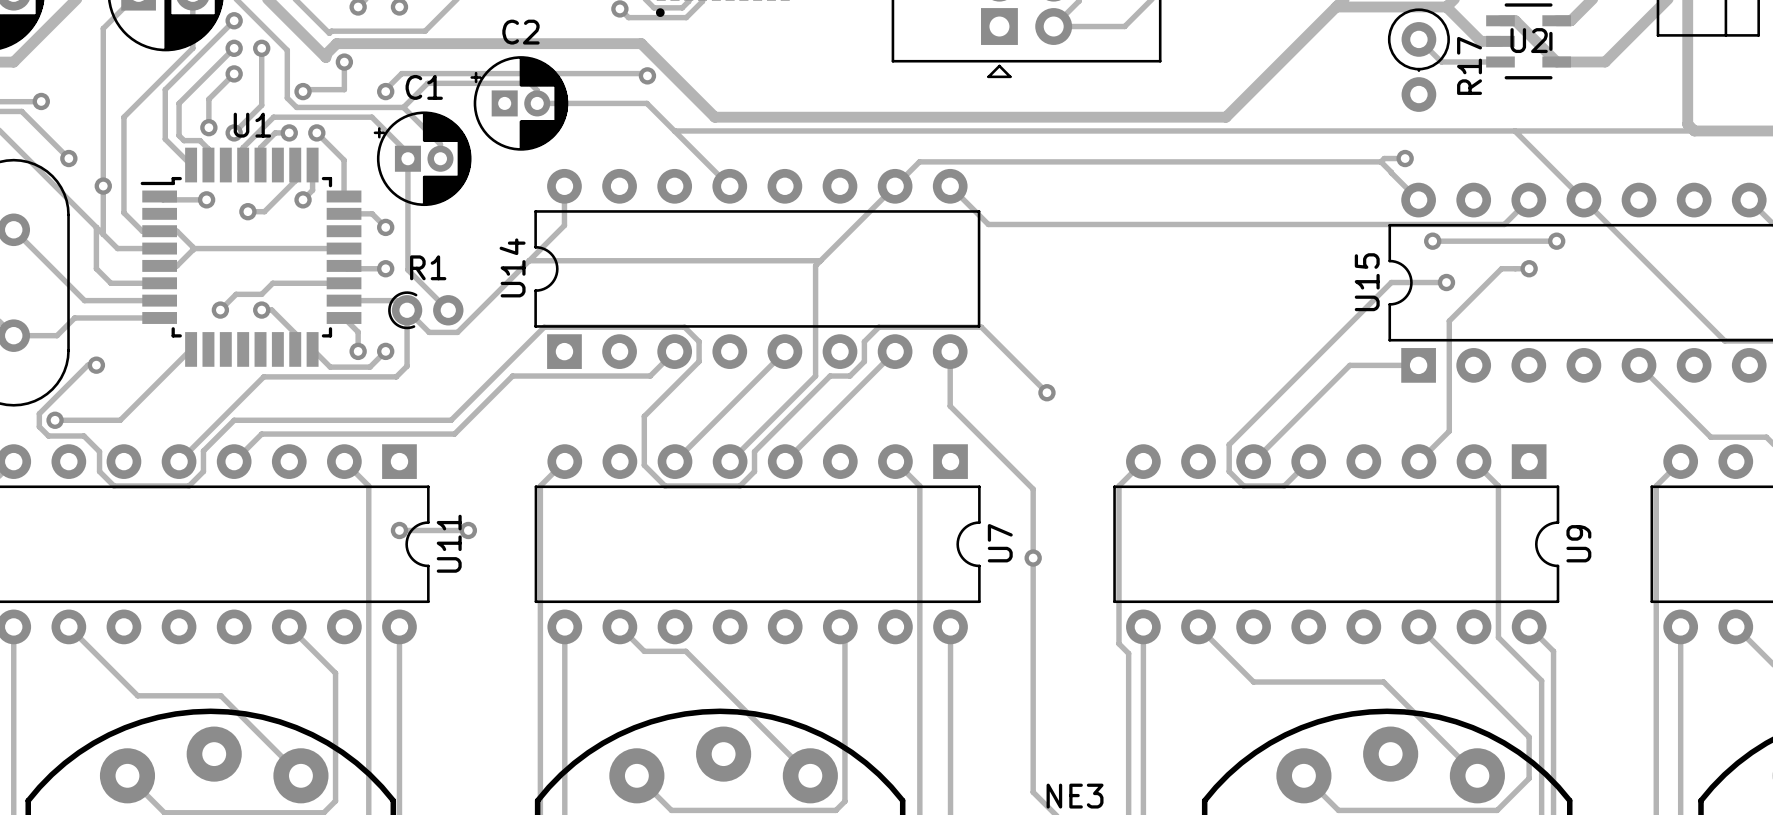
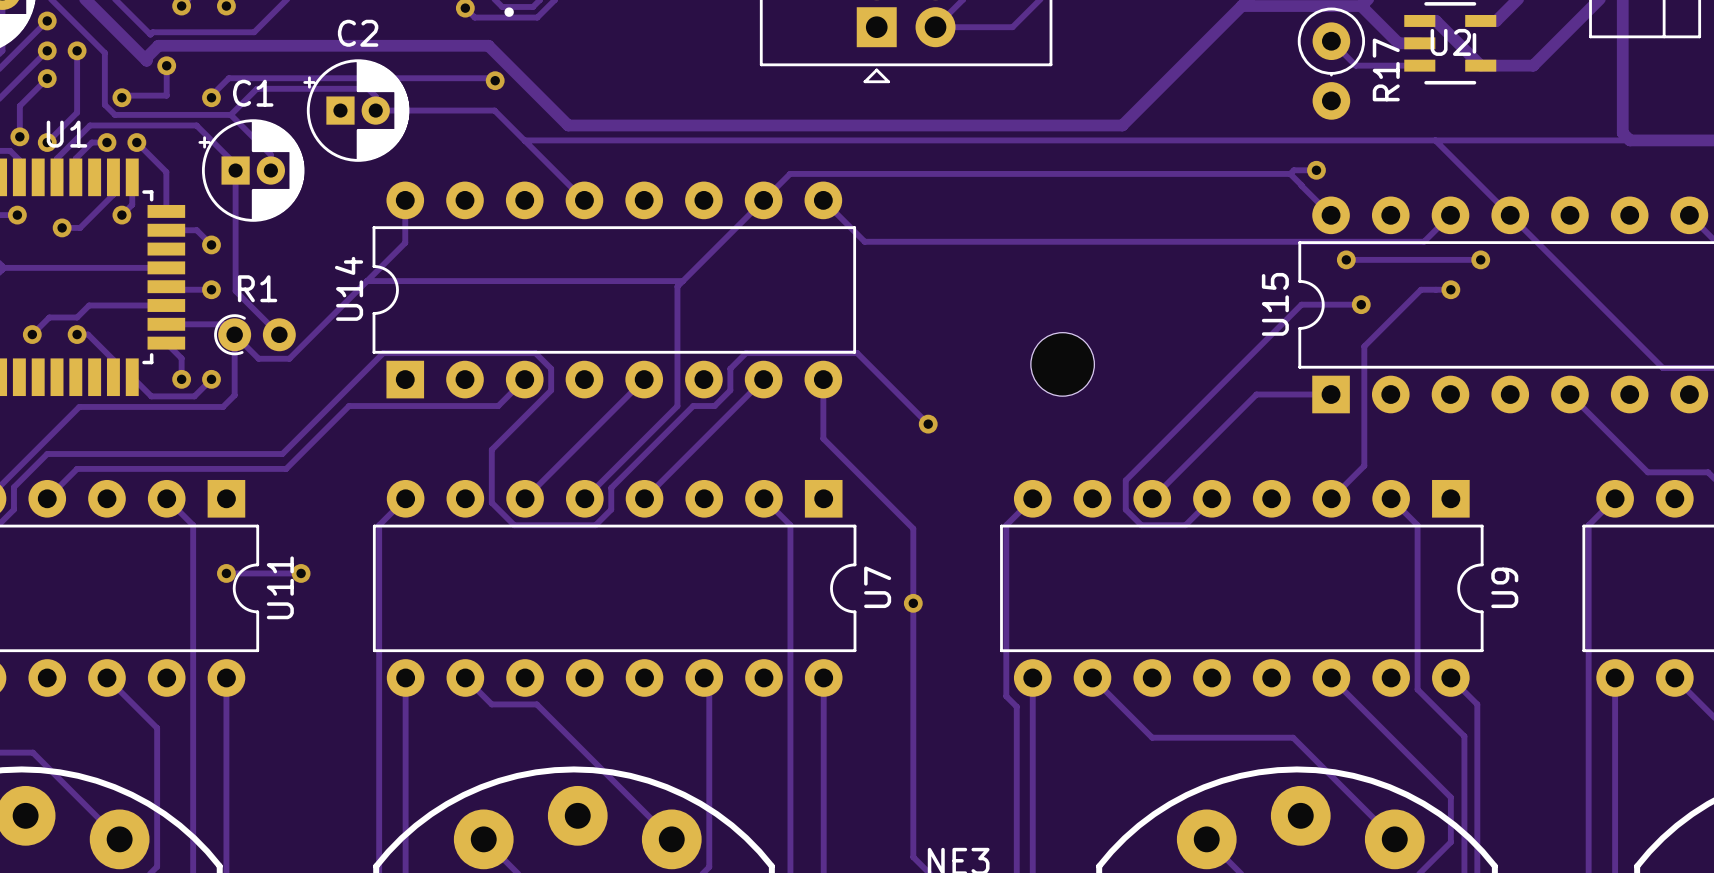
part: none -> (1062, 364)

